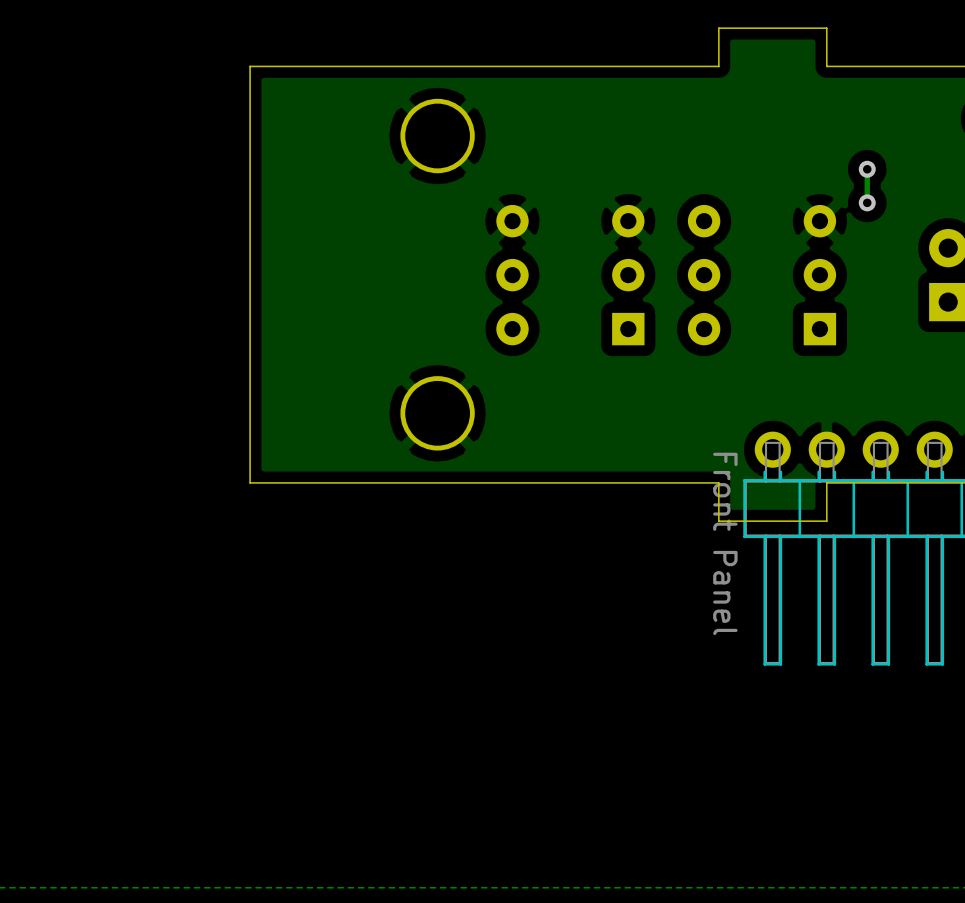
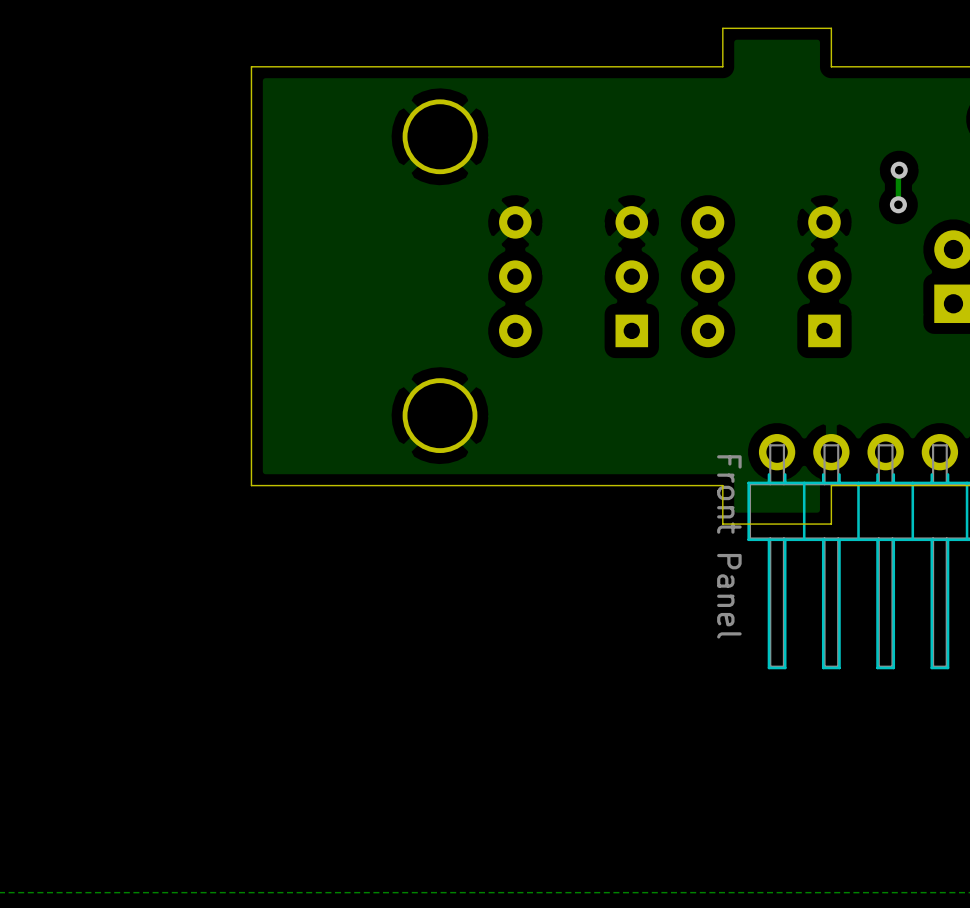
track: (867, 169) (867, 202) -> none
via: (867, 169) -> none
track: none -> (899, 170) (898, 204)
via: none -> (899, 170)
via: (867, 202) -> none
via: none -> (898, 204)

